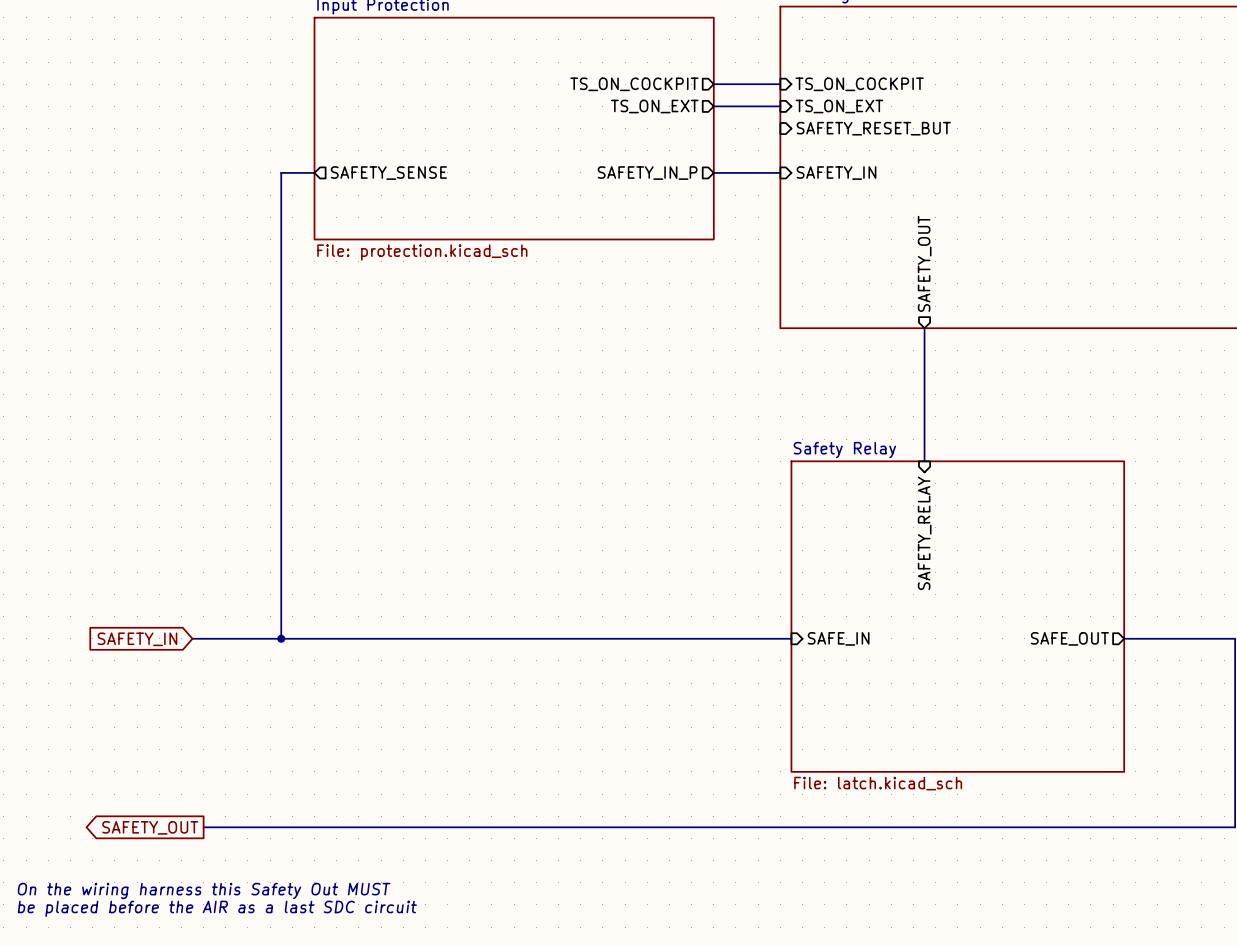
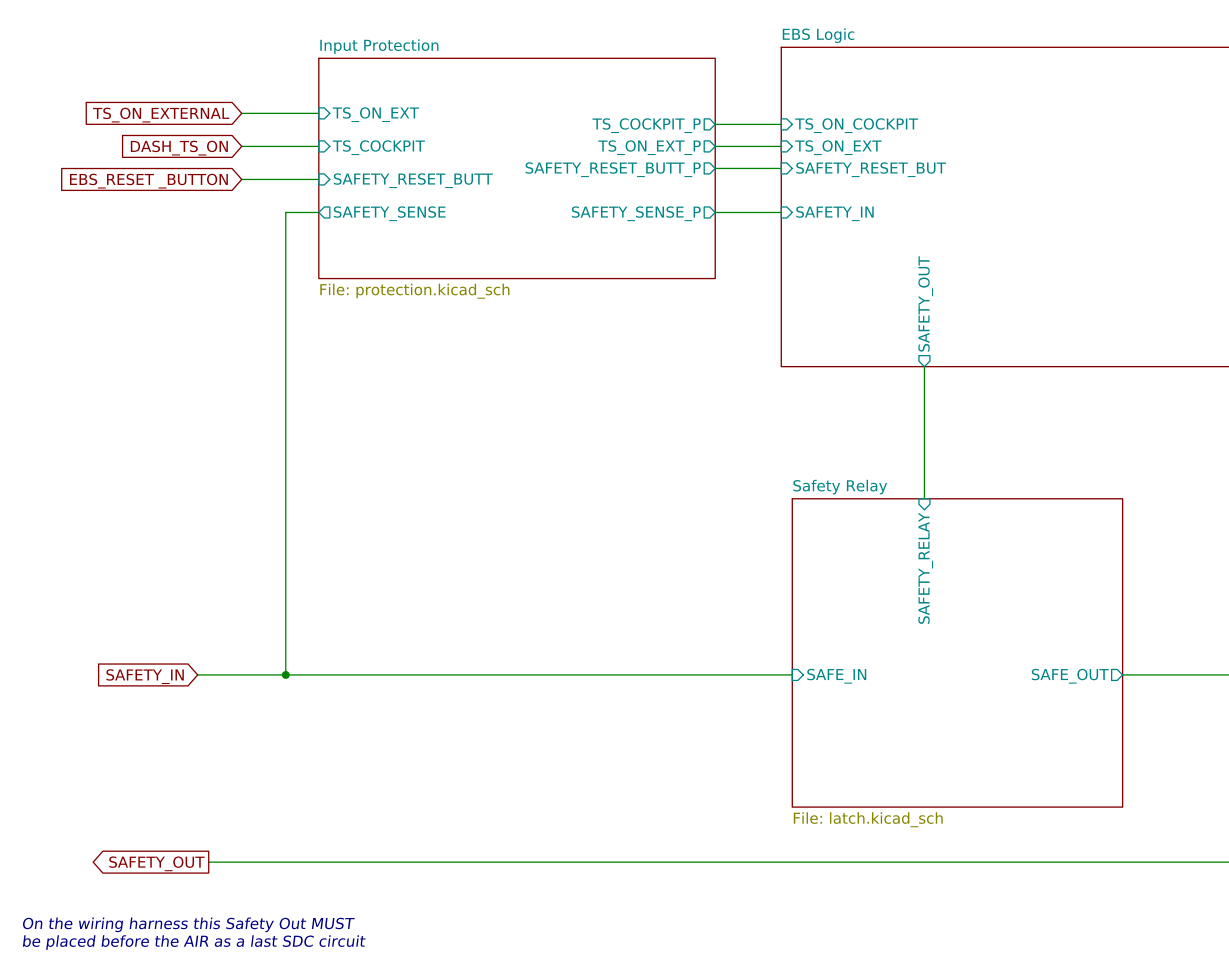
global label: none -> TS_ON_EXTERNAL (161, 115)
wire: none -> (241, 113) (318, 113)
sheet pin: none -> TS_ON_EXT (375, 114)
sheet pin: TS_ON_COCKPIT (634, 84) -> TS_COCKPIT_P (646, 125)
global label: none -> DASH_TS_ON (179, 148)
wire: none -> (241, 146) (318, 146)
sheet pin: none -> TS_COCKPIT (378, 147)
sheet pin: TS_ON_EXT (654, 106) -> TS_ON_EXT_P (649, 147)
sheet pin: none -> SAFETY_RESET_BUTT_P (613, 169)
wire: none -> (715, 168) (781, 168)
wire: none -> (241, 179) (318, 179)
sheet pin: none -> SAFETY_RESET_BUTT (413, 180)
global label: none -> EBS_RESET _BUTTON (148, 181)
sheet pin: SAFETY_IN_P (647, 173) -> SAFETY_SENSE_P (636, 213)

